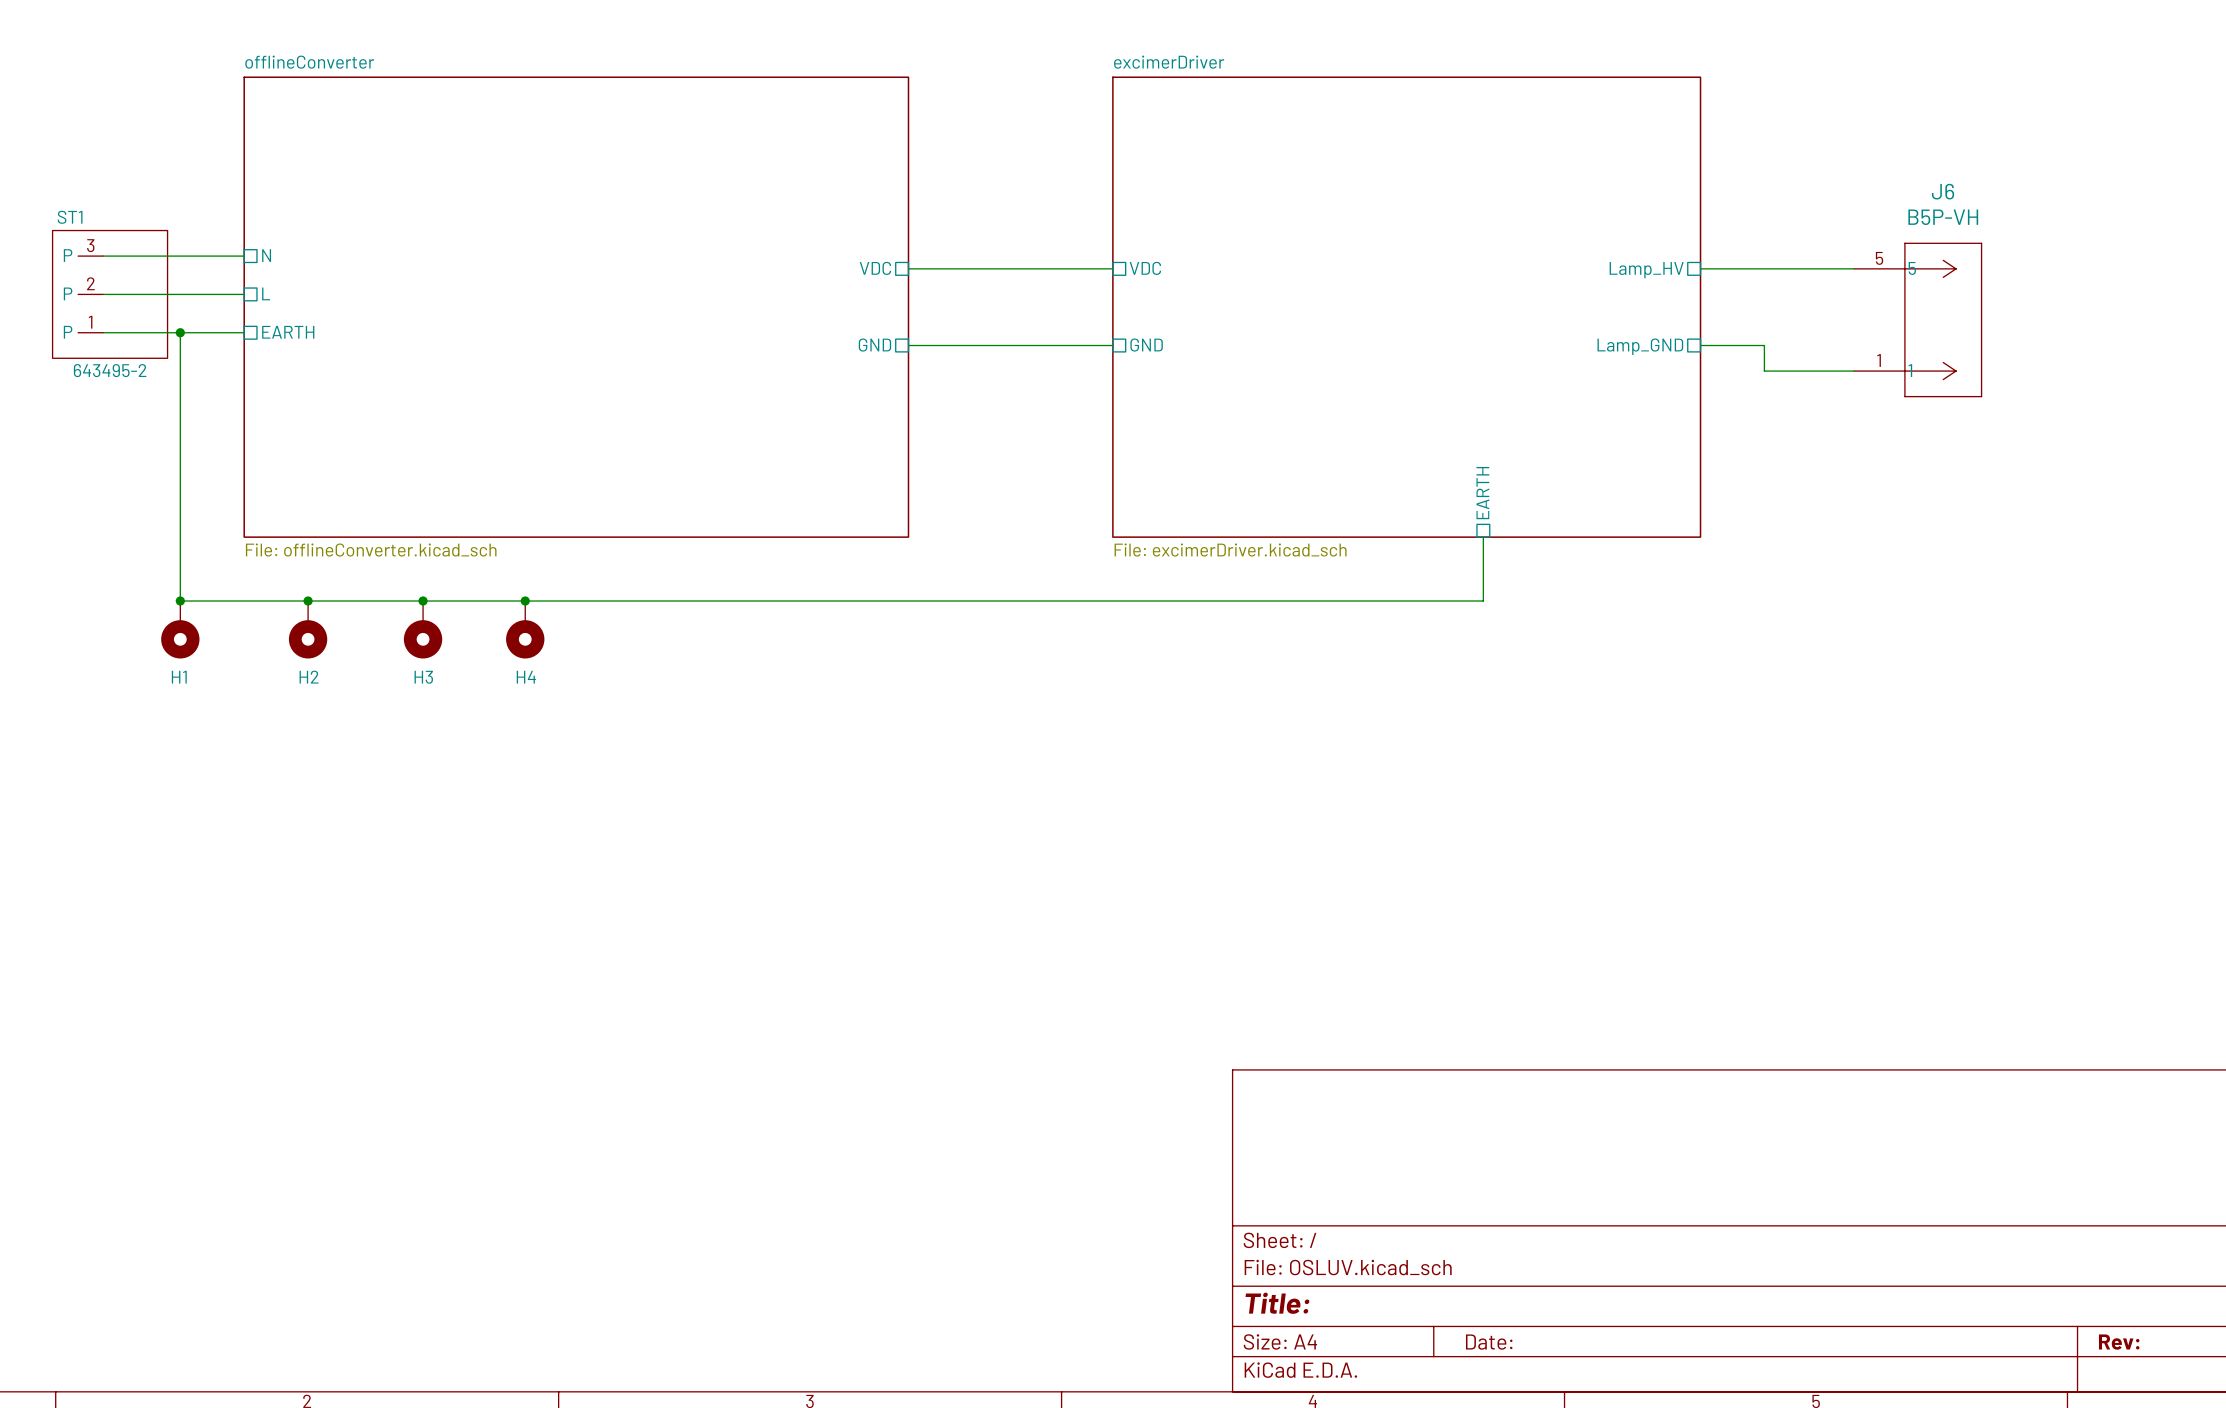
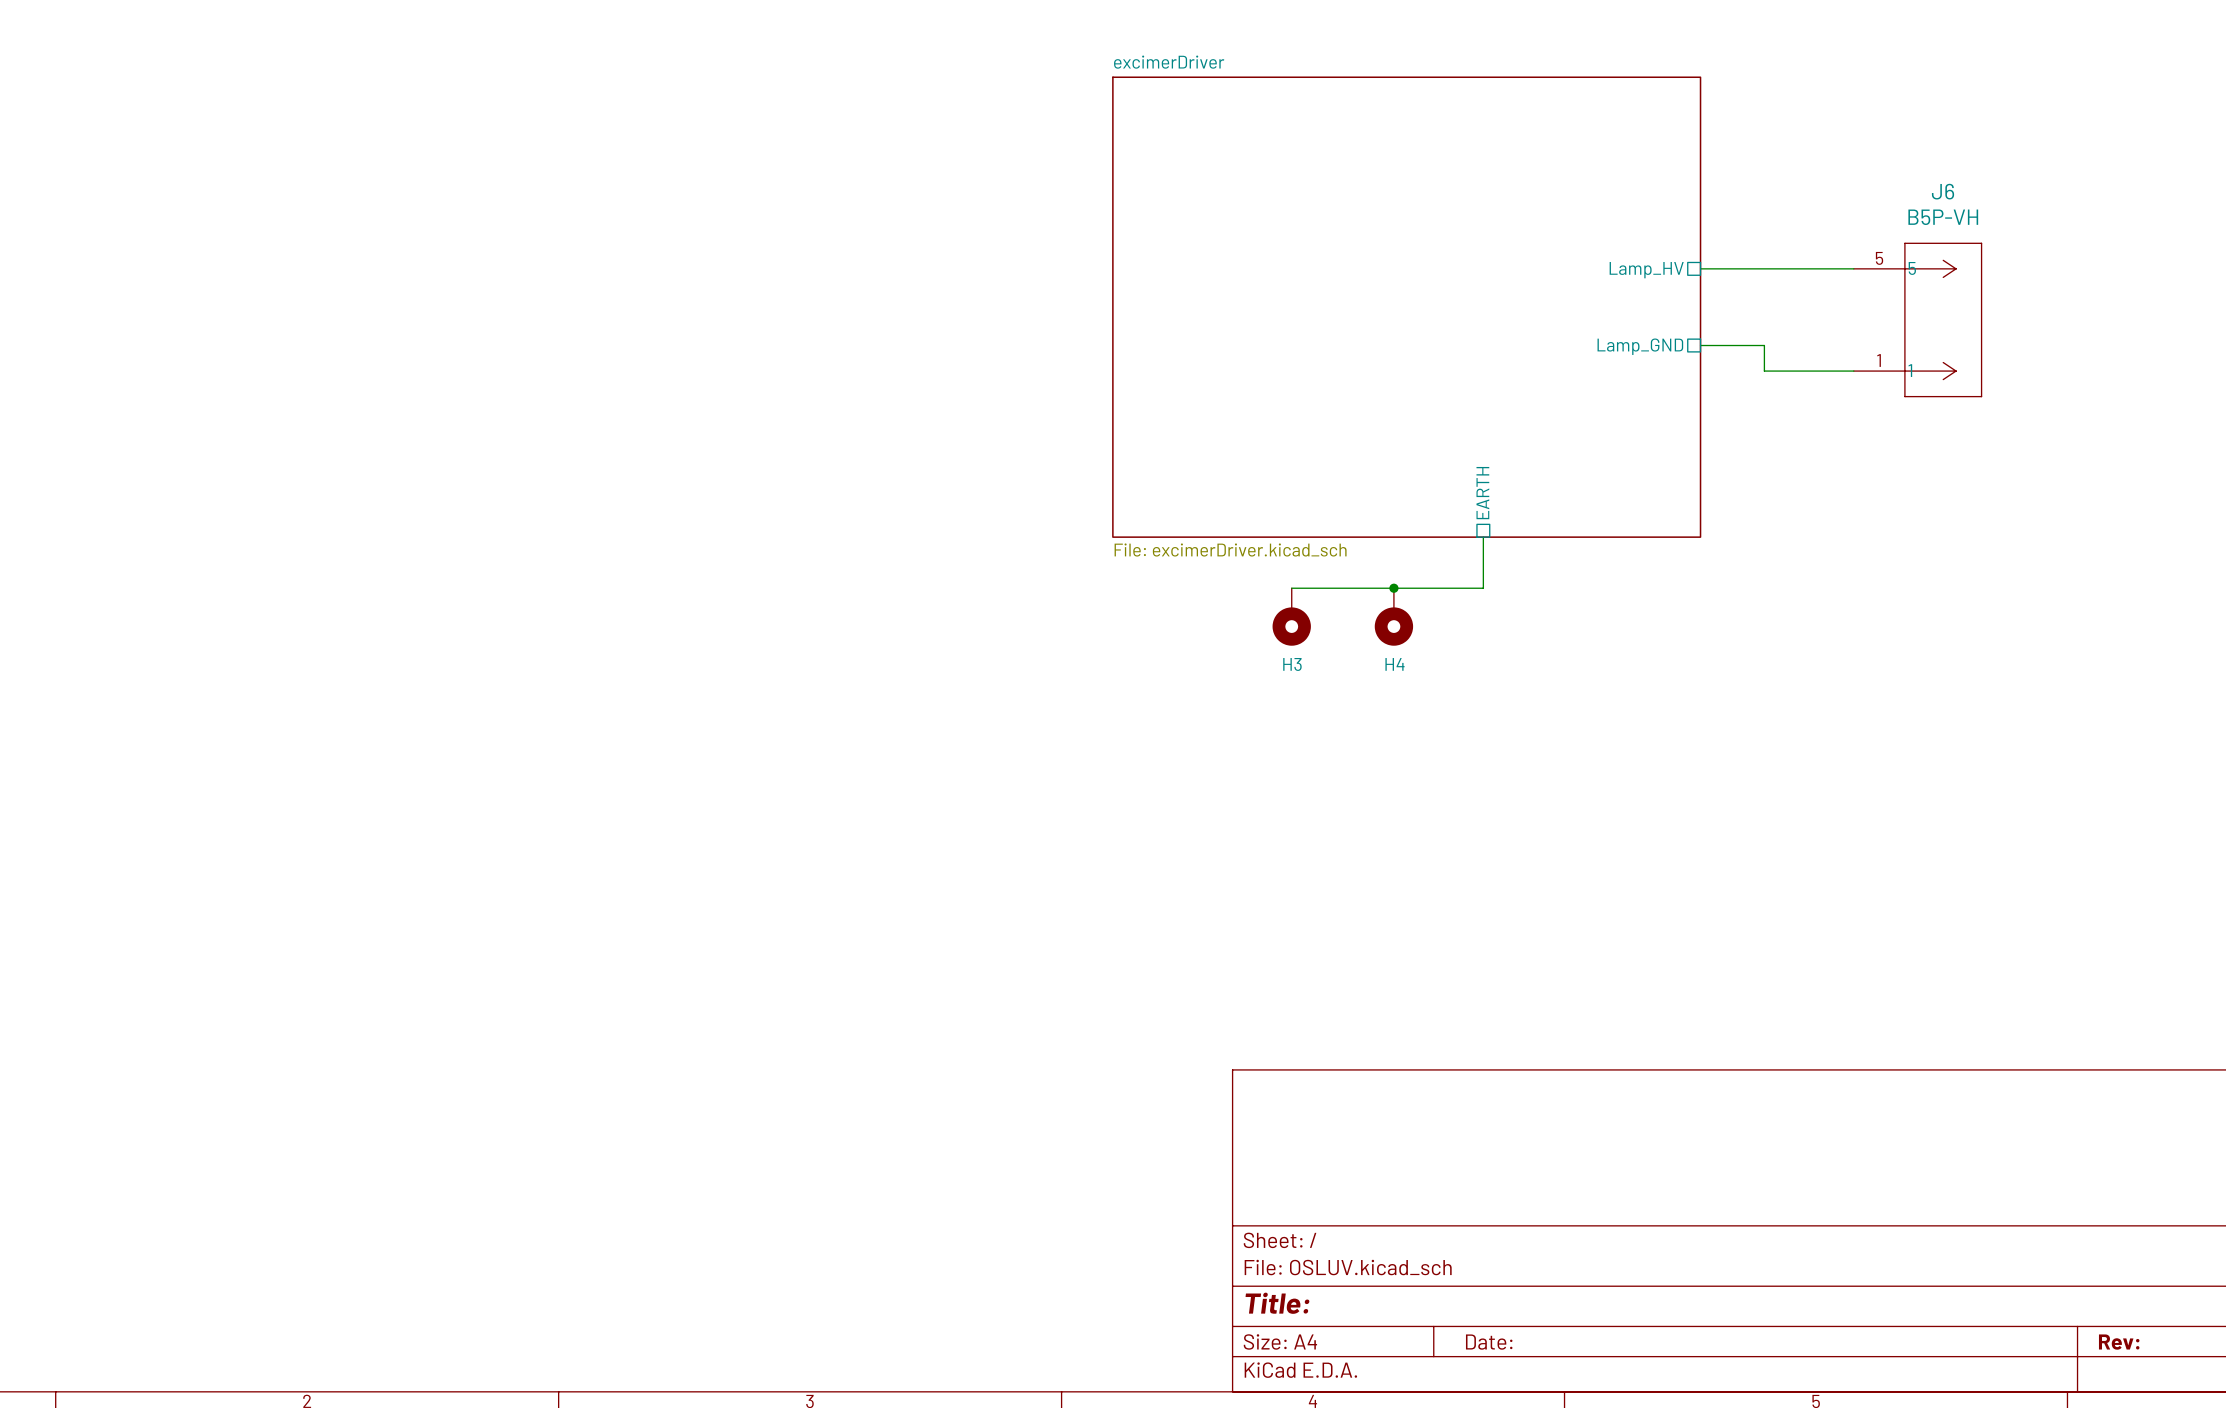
sheet pin: N (266, 255) -> none
wire: (103, 256) (244, 256) -> none
sheet pin: VDC (875, 268) -> none
wire: (908, 268) (1112, 268) -> none
sheet pin: VDC (1145, 268) -> none
sheet pin: L (266, 293) -> none
wire: (103, 294) (244, 294) -> none
ST1: 643495-2 (110, 294) -> none
sheet offlineConverter: File: offlineConverter.kicad_sch (576, 307) -> none
wire: (103, 332) (244, 332) -> none
wire: (180, 332) (180, 601) (1483, 601) (1483, 588) -> (1291, 588) (1483, 588)
junction: (180, 332) -> none
sheet pin: EARTH (288, 332) -> none
sheet pin: GND (874, 345) -> none
wire: (908, 345) (1112, 345) -> none
sheet pin: GND (1146, 345) -> none
junction: none -> (1393, 588)
junction: (180, 601) -> none
junction: (308, 601) -> none
junction: (423, 601) -> none
junction: (525, 601) -> none
H1: (180, 629) -> none
H2: (308, 629) -> none
H3 position: (423, 629) -> (1291, 616)
H4 position: (525, 629) -> (1393, 616)

